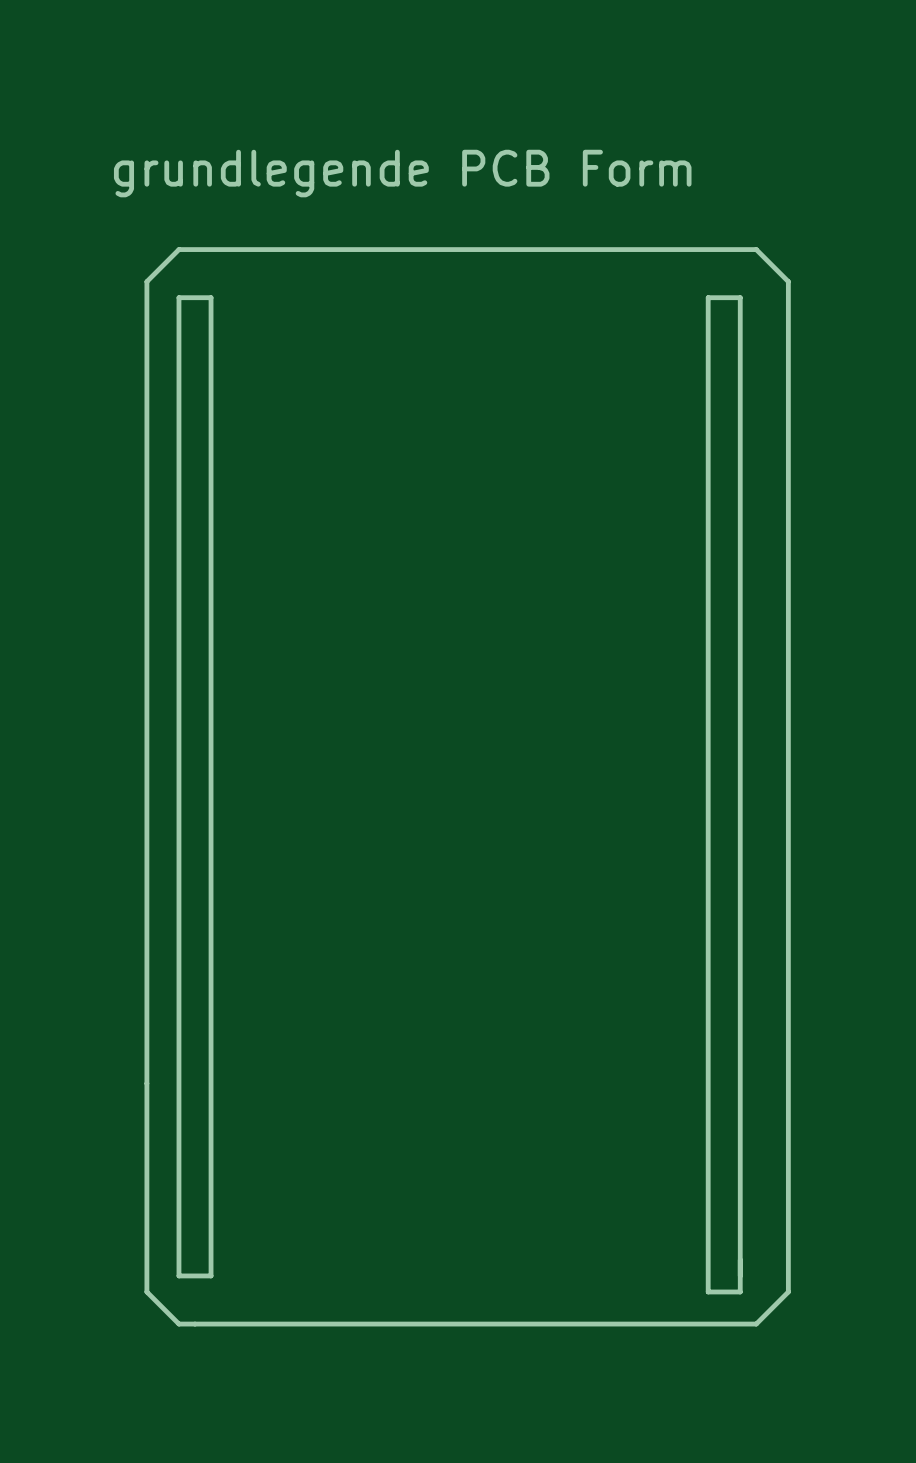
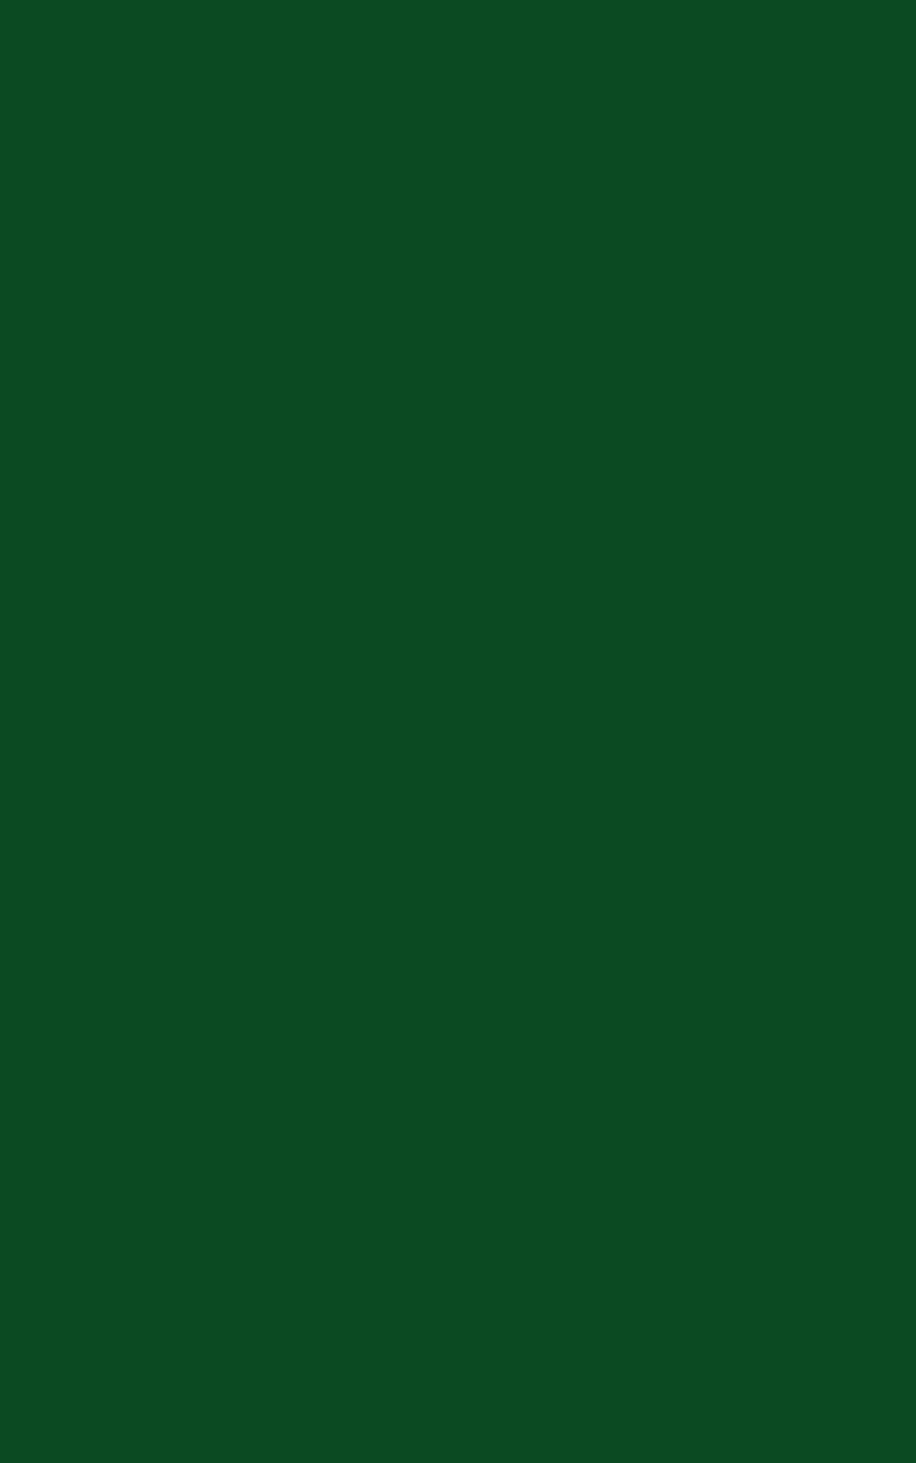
text: grundlegende PCB Form (402, 173) -> none
line: (178, 249) (756, 249) (788, 281) (788, 1291) (756, 1324) (178, 1324) (146, 1291) (146, 281) (178, 249) -> none
line: (178, 297) (211, 297) (211, 1275) (178, 1275) (178, 297) -> none
line: (708, 297) (708, 1291) (740, 1291) (740, 297) (708, 297) -> none

